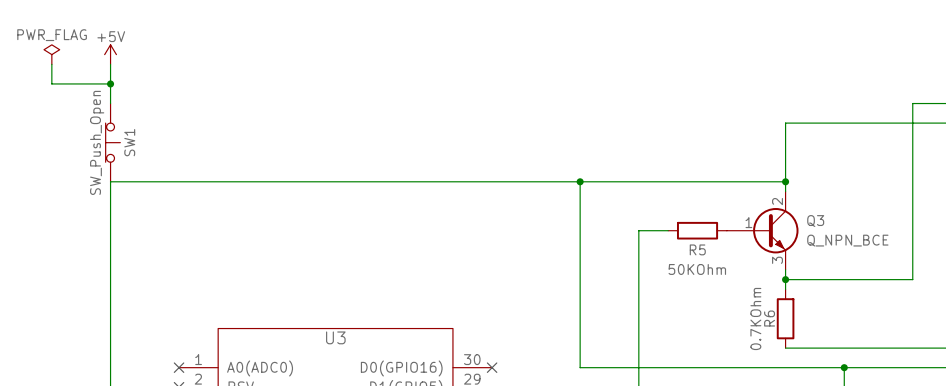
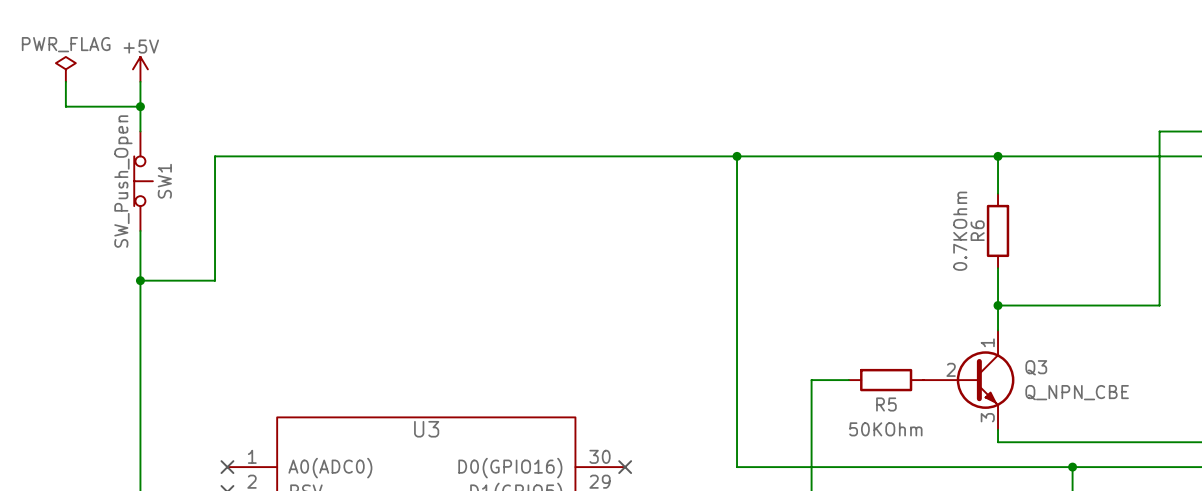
wire: none -> (737, 156) (737, 230)
junction: none -> (737, 156)
wire: none -> (998, 156) (215, 156) (215, 280) (140, 280)
junction: none -> (998, 156)
wire: (785, 152) (785, 191) -> none
wire: (110, 181) (785, 181) -> none
junction: (580, 181) -> none
junction: (785, 181) -> none
Q3 pin number: 2 (777, 201) -> 1 (987, 342)
wire: none -> (998, 268) (998, 330)
junction: none -> (140, 280)
Q3 pin number: 1 (748, 222) -> 2 (951, 369)
wire: (668, 230) (638, 230) (638, 299) -> (848, 380) (811, 380)
R5 position: (697, 230) -> (886, 380)
Q3 position: (762, 230) -> (968, 380)
junction: none -> (998, 305)
Q3 value: Q_NPN_BCE (847, 240) -> Q_NPN_CBE (1077, 392)
wire: (912, 240) (912, 279) (785, 279) -> (1159, 305) (998, 305)
junction: (785, 279) -> none
R6 position: (785, 318) -> (998, 230)

